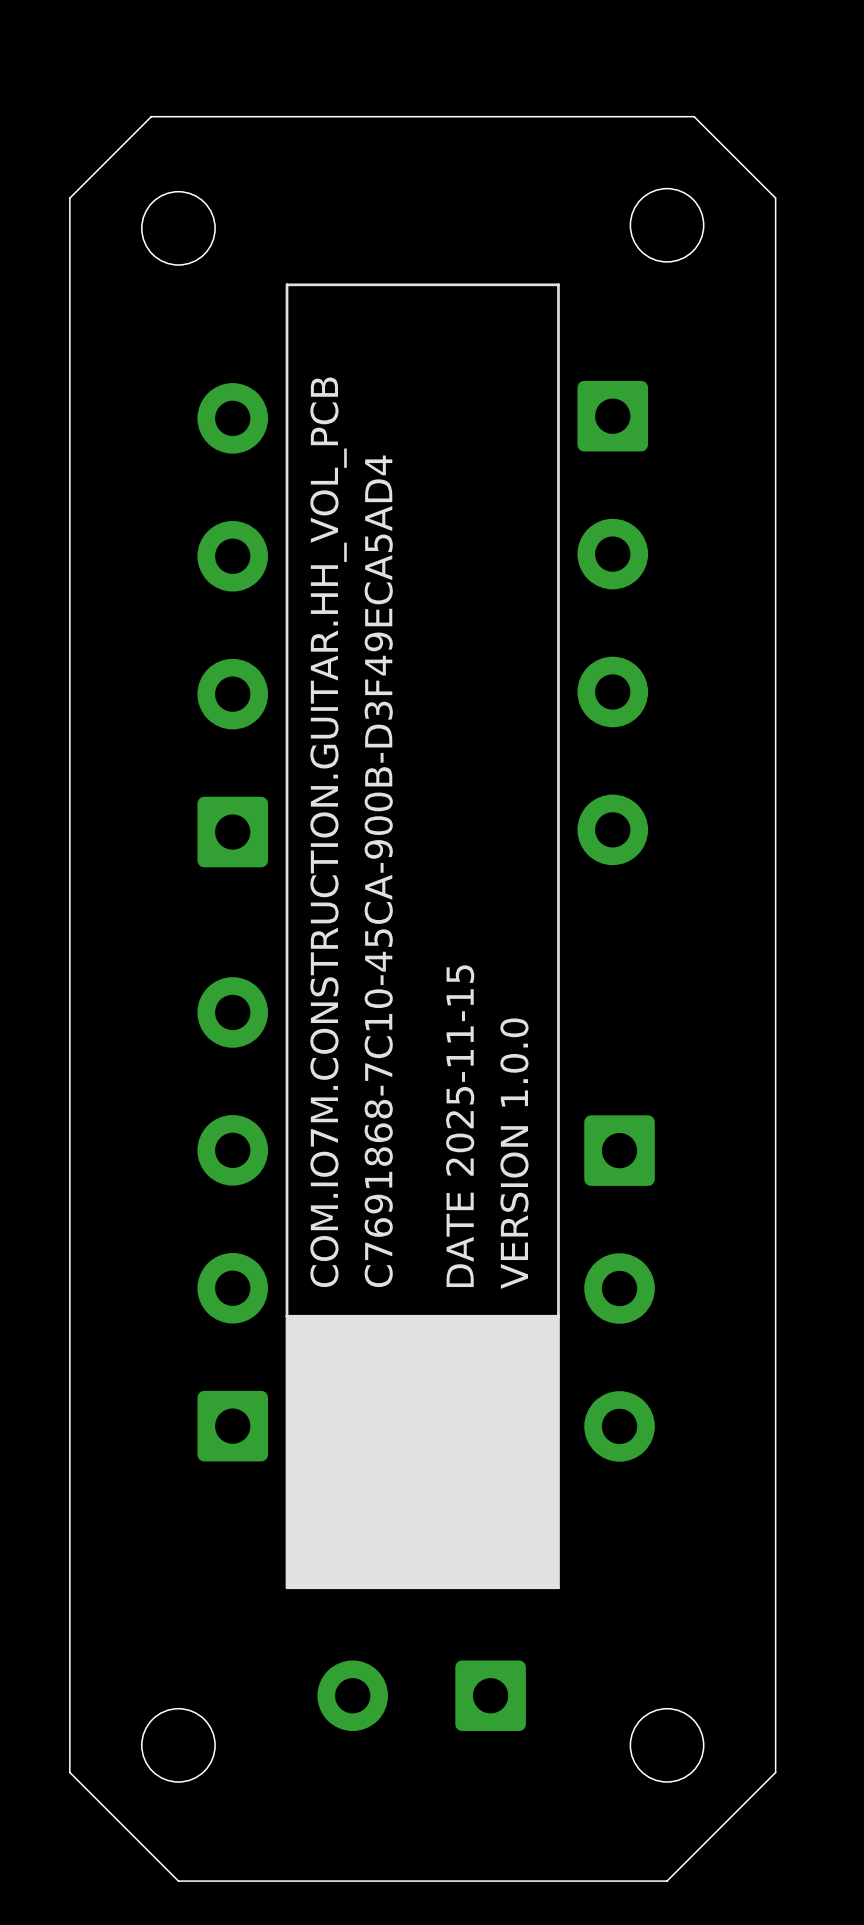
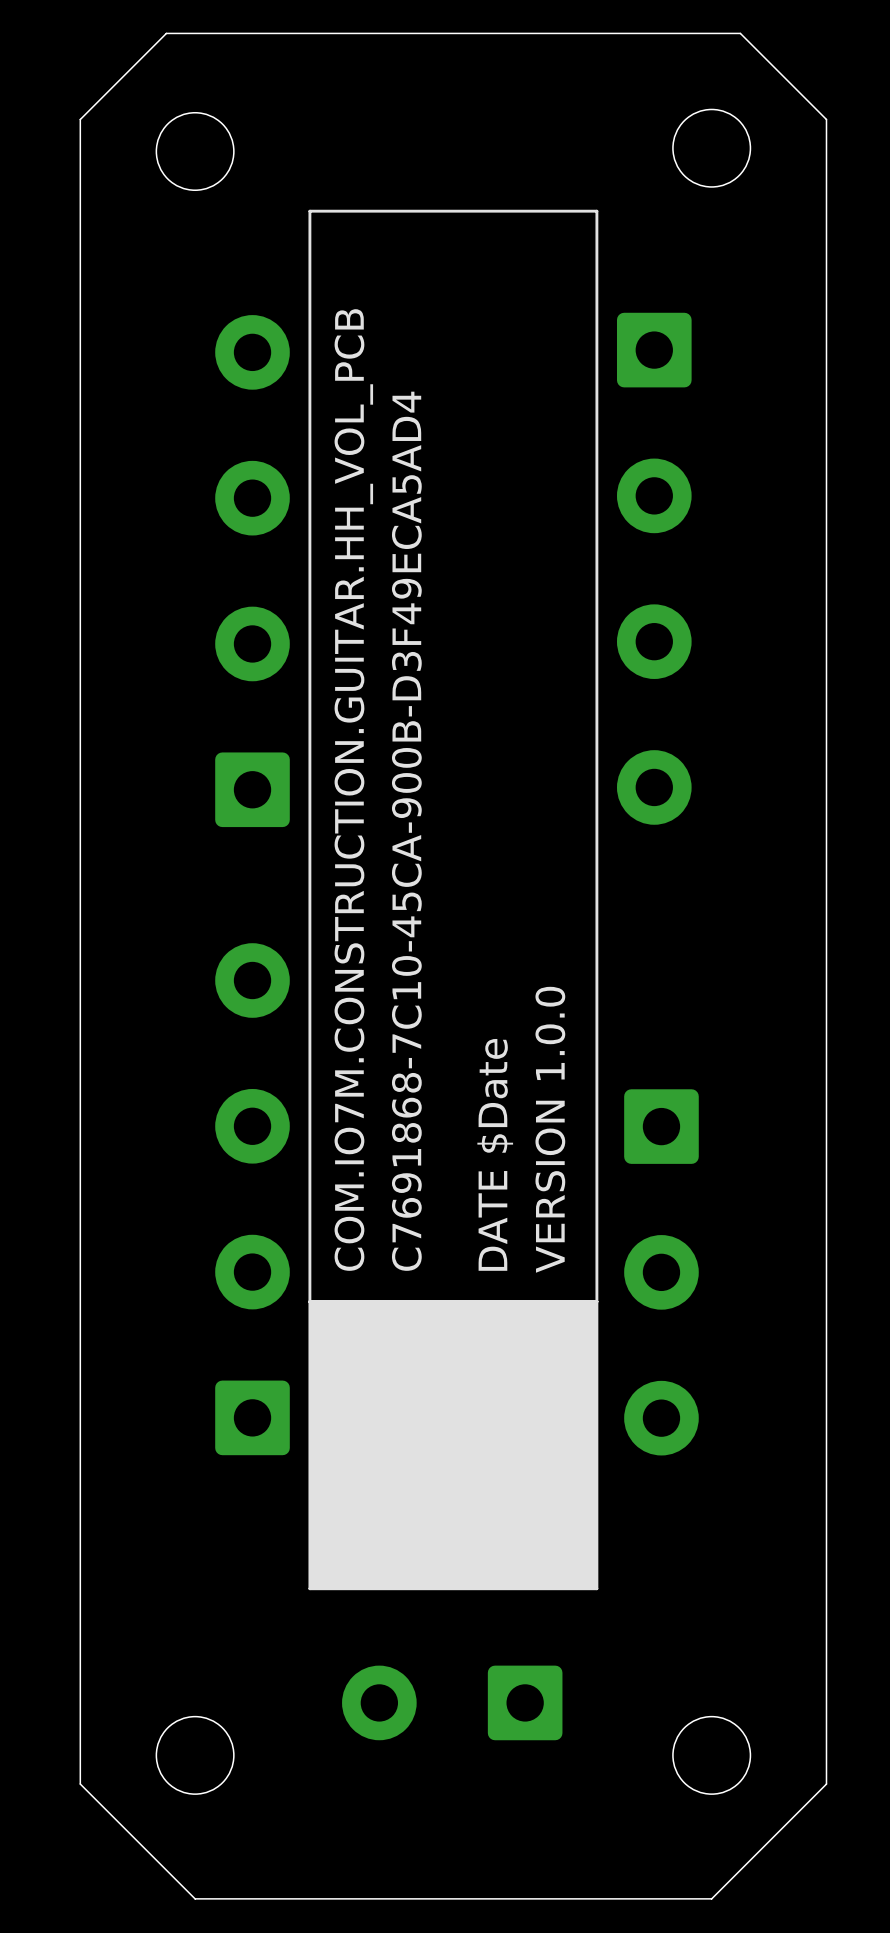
text: DATE 2025-11-15 (460, 1126) -> DATE $Date (495, 1154)

